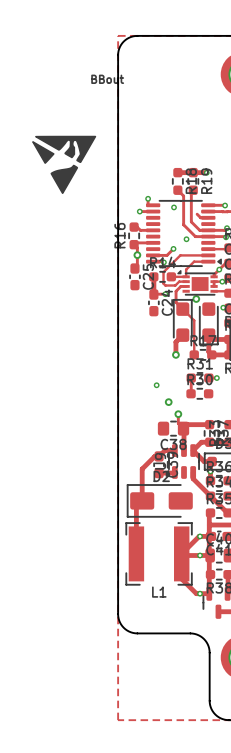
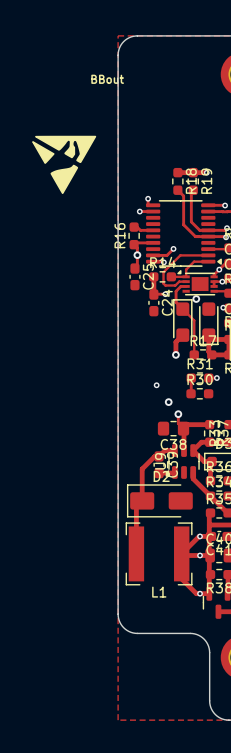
via: (174, 207) -> none
track: (197, 214) (200, 217) (208, 217) -> none
via: (186, 239) -> none
via: (210, 471) -> none

